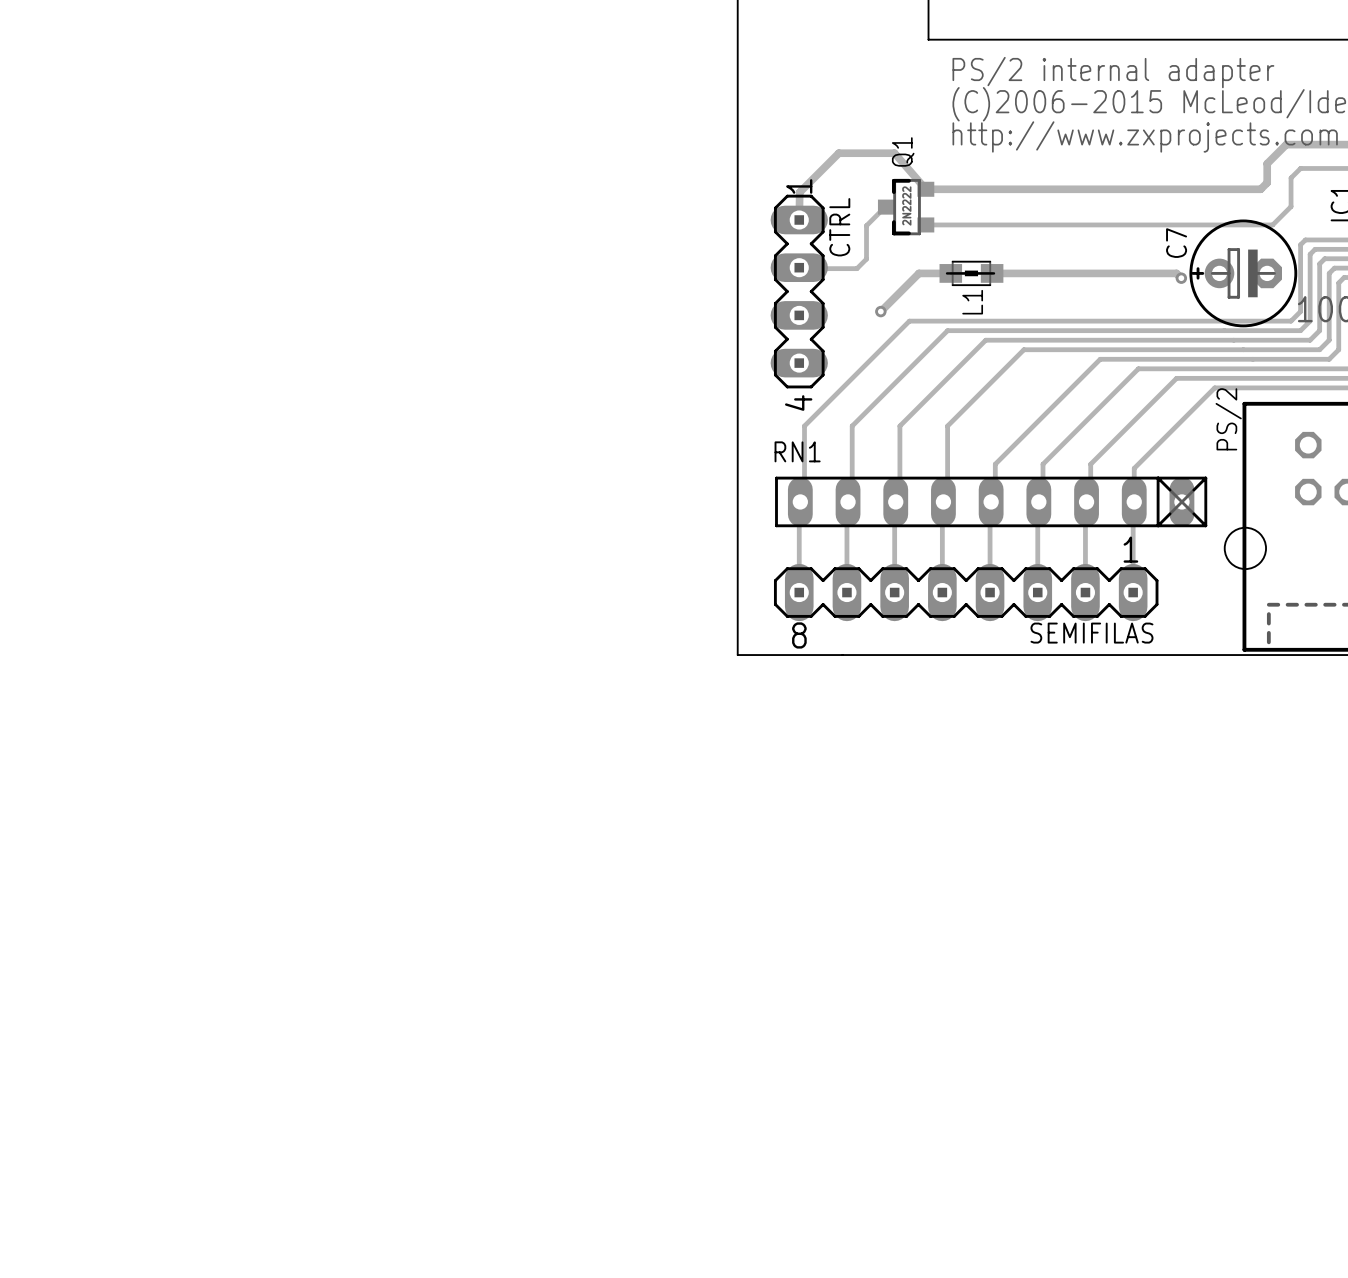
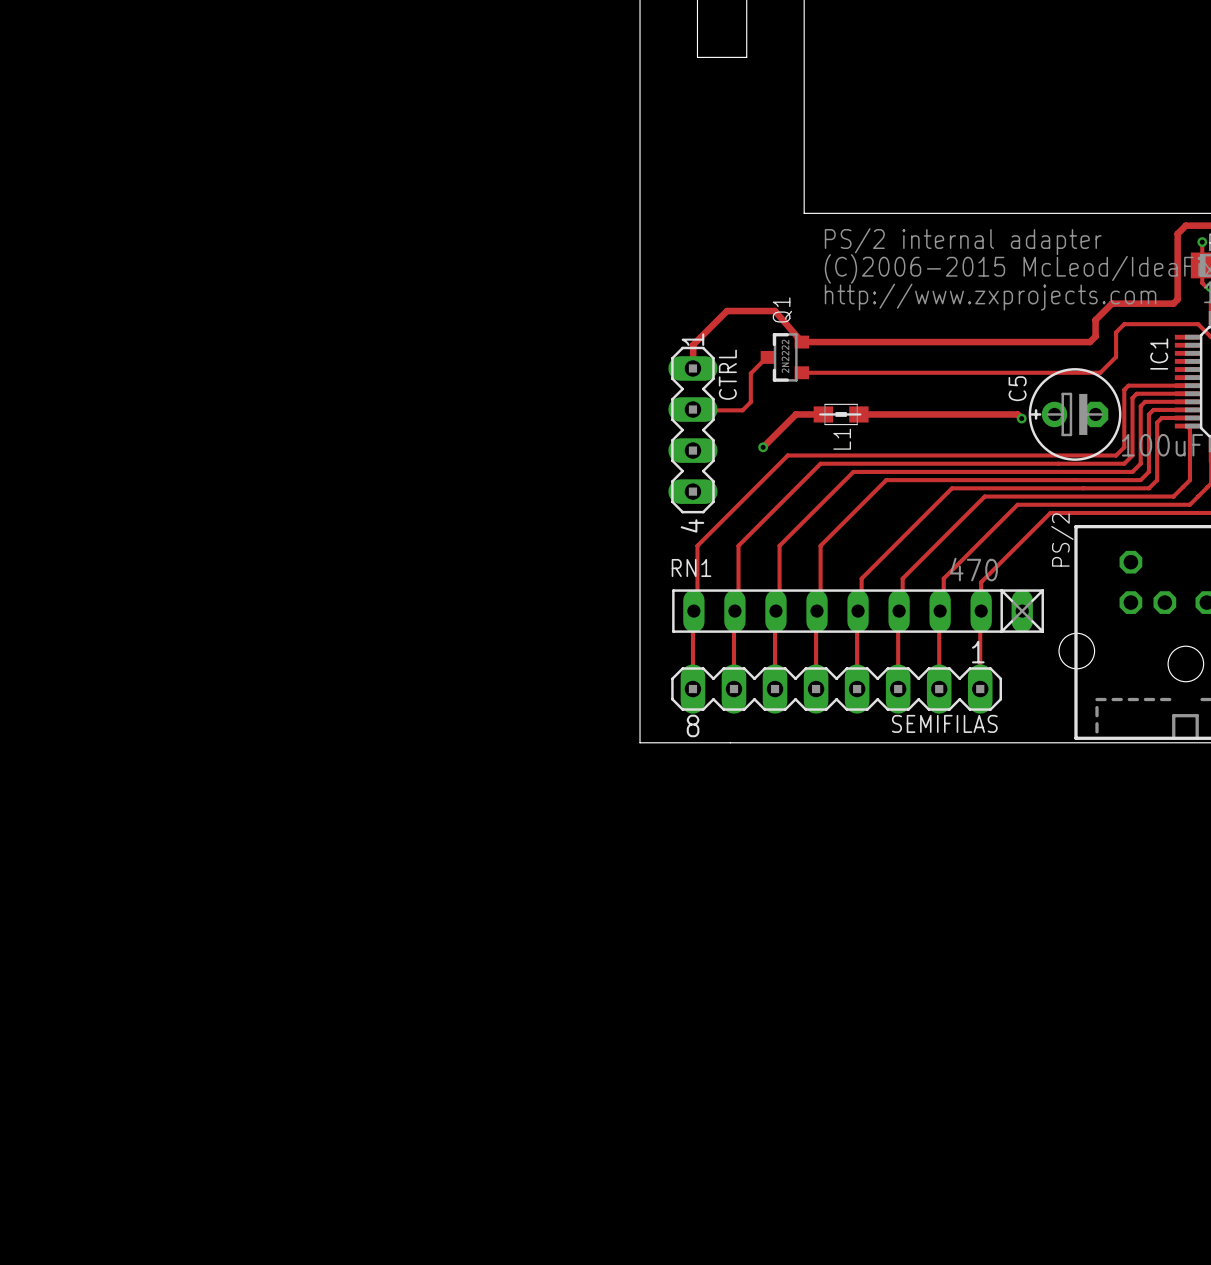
C7 name: C7 (1176, 243) -> C5 (1017, 388)
RN1 value: none -> 470 (973, 569)

